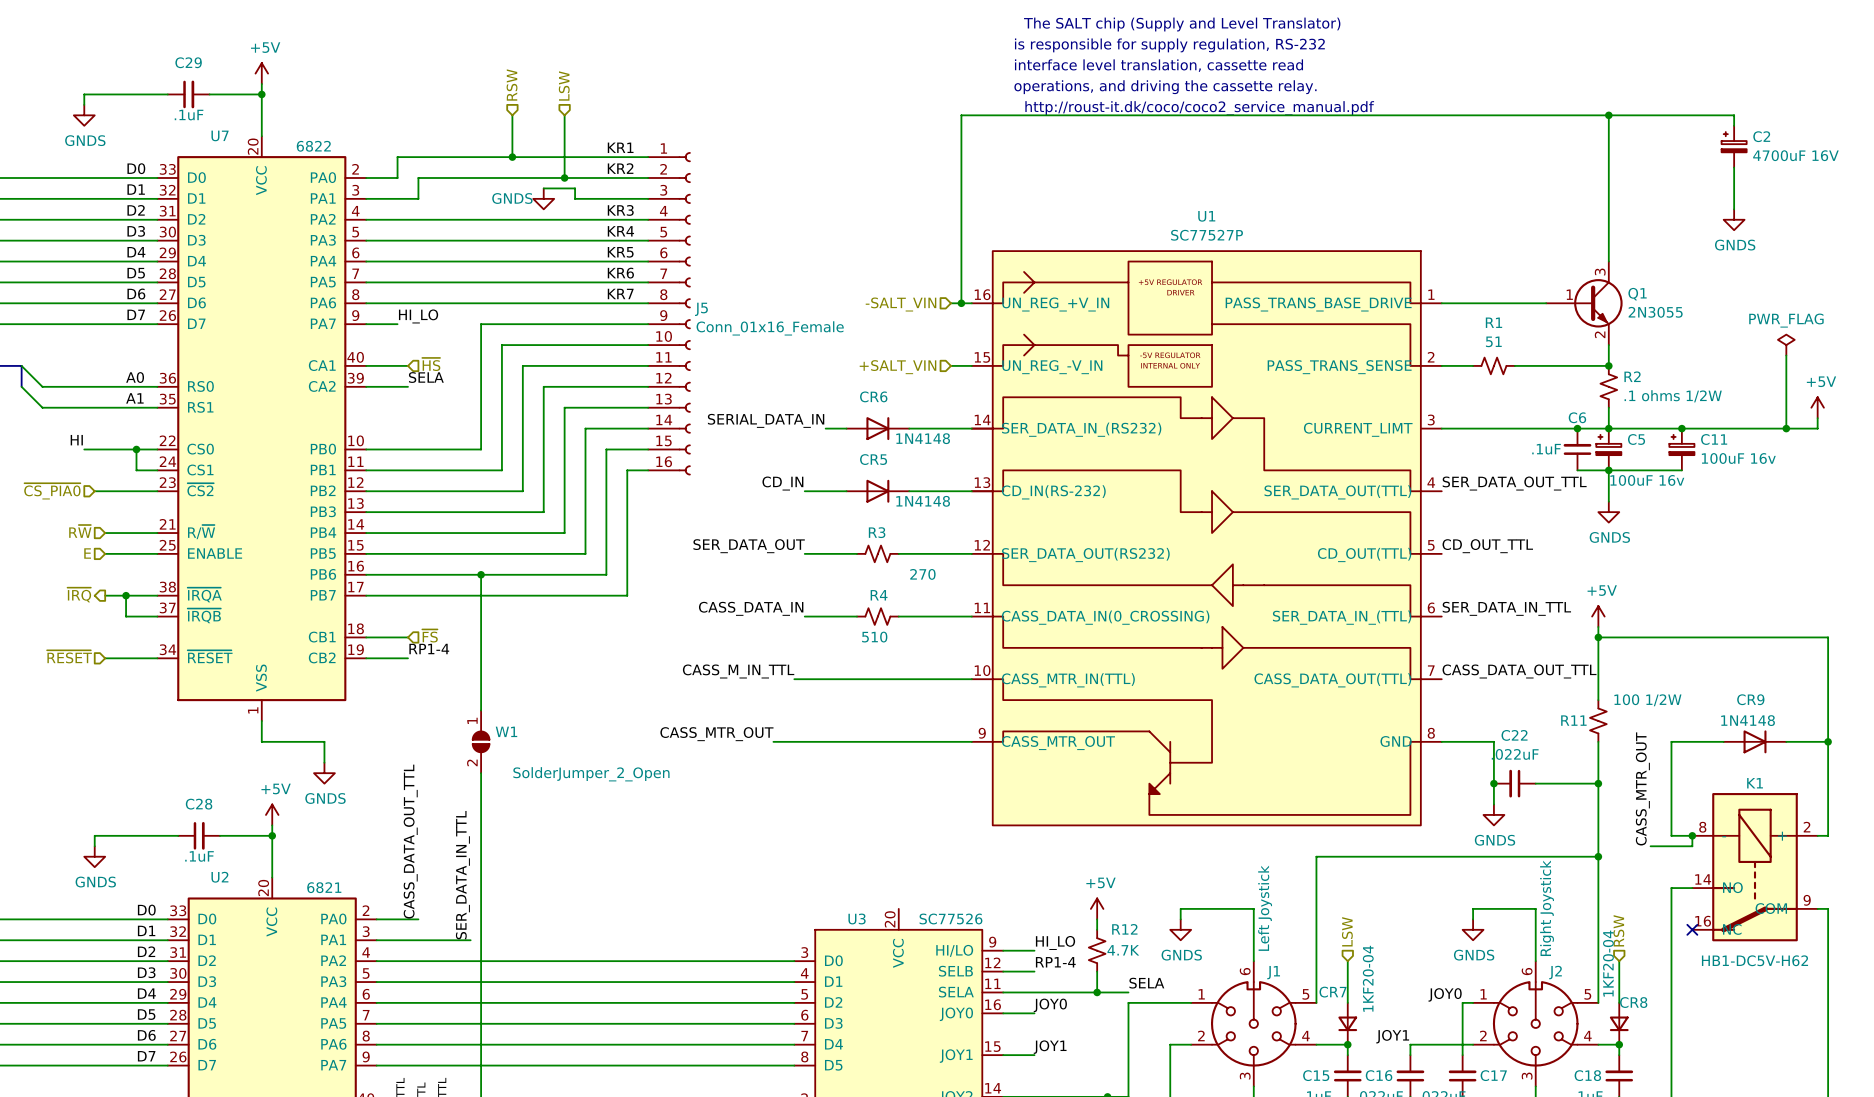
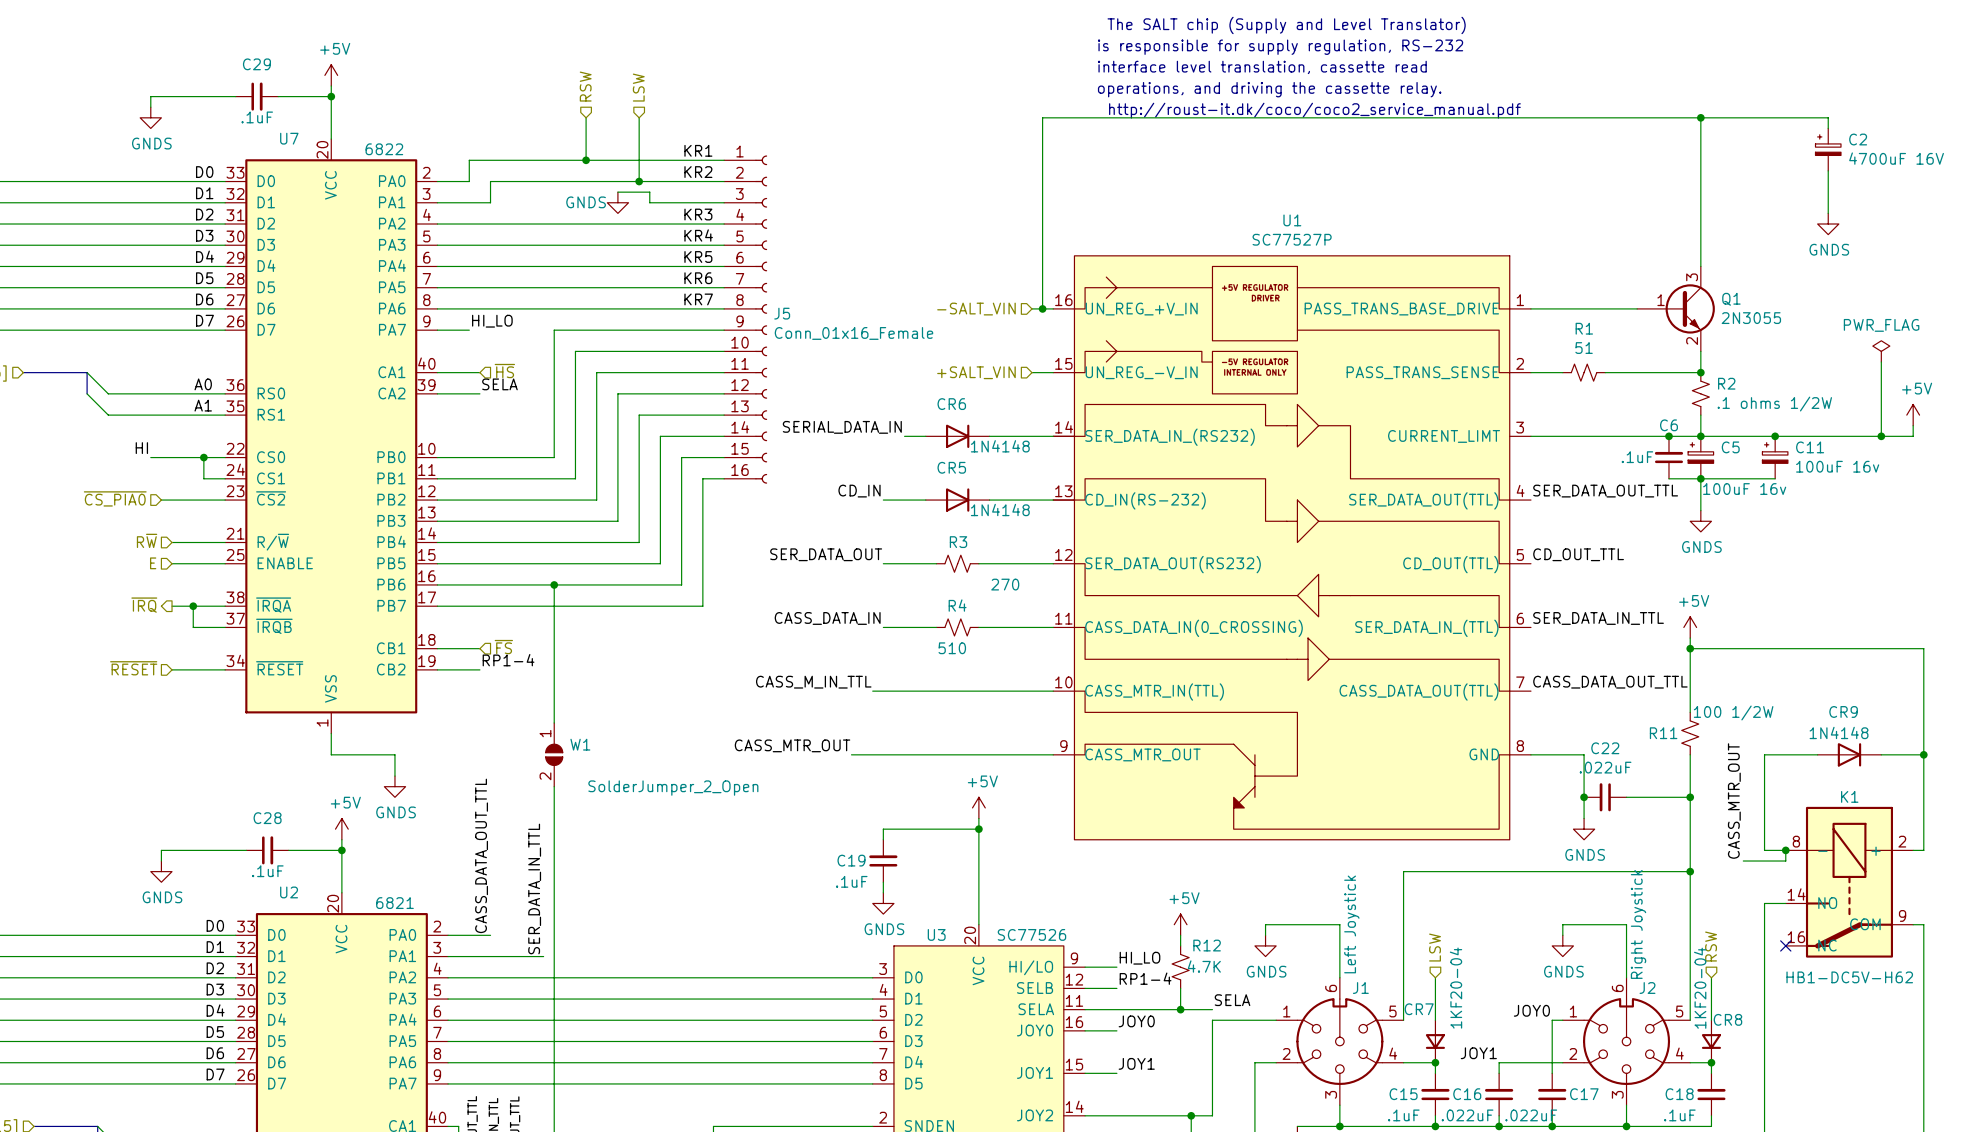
power symbol: none -> +5V (978, 807)
wire: none -> (978, 818) (978, 924)
wire: none -> (978, 829) (883, 829) (883, 839)
junction: none -> (978, 829)
C19: none -> .1uF (883, 861)
wire: none -> (883, 882) (883, 892)
power symbol: none -> GNDS (883, 903)

